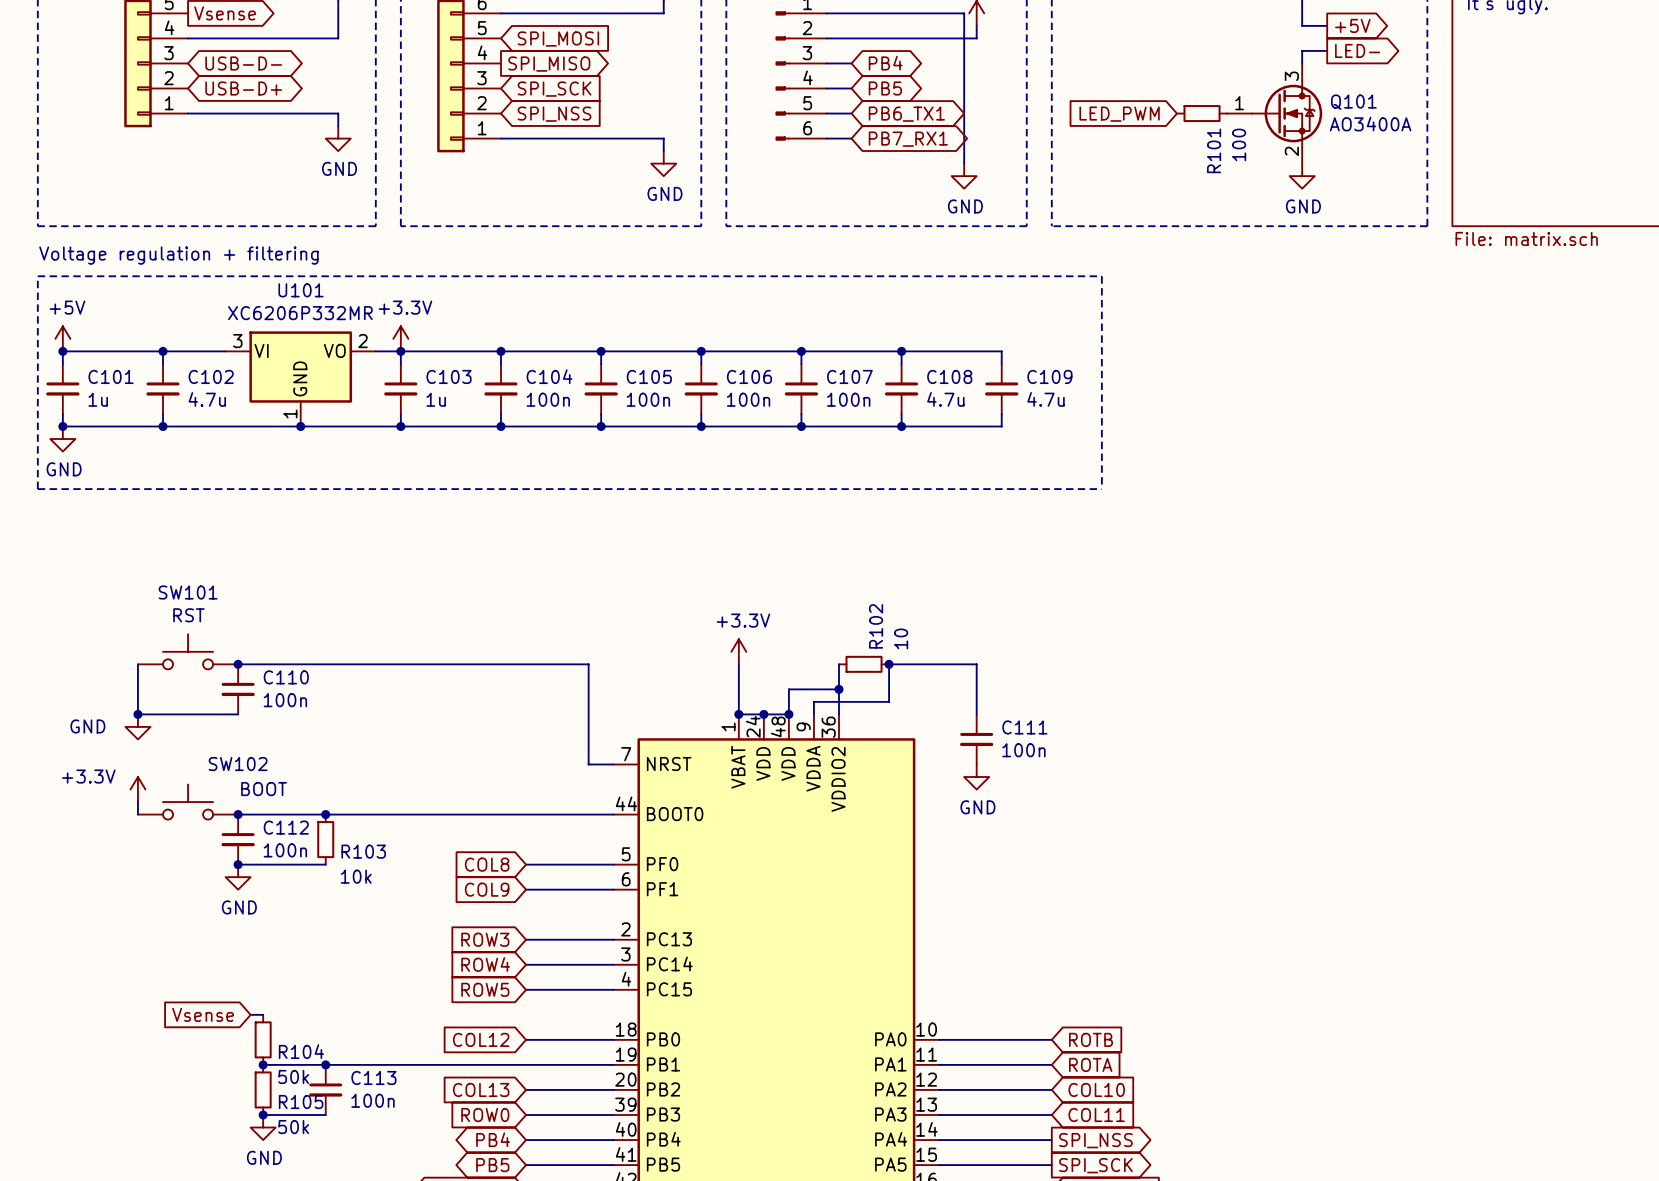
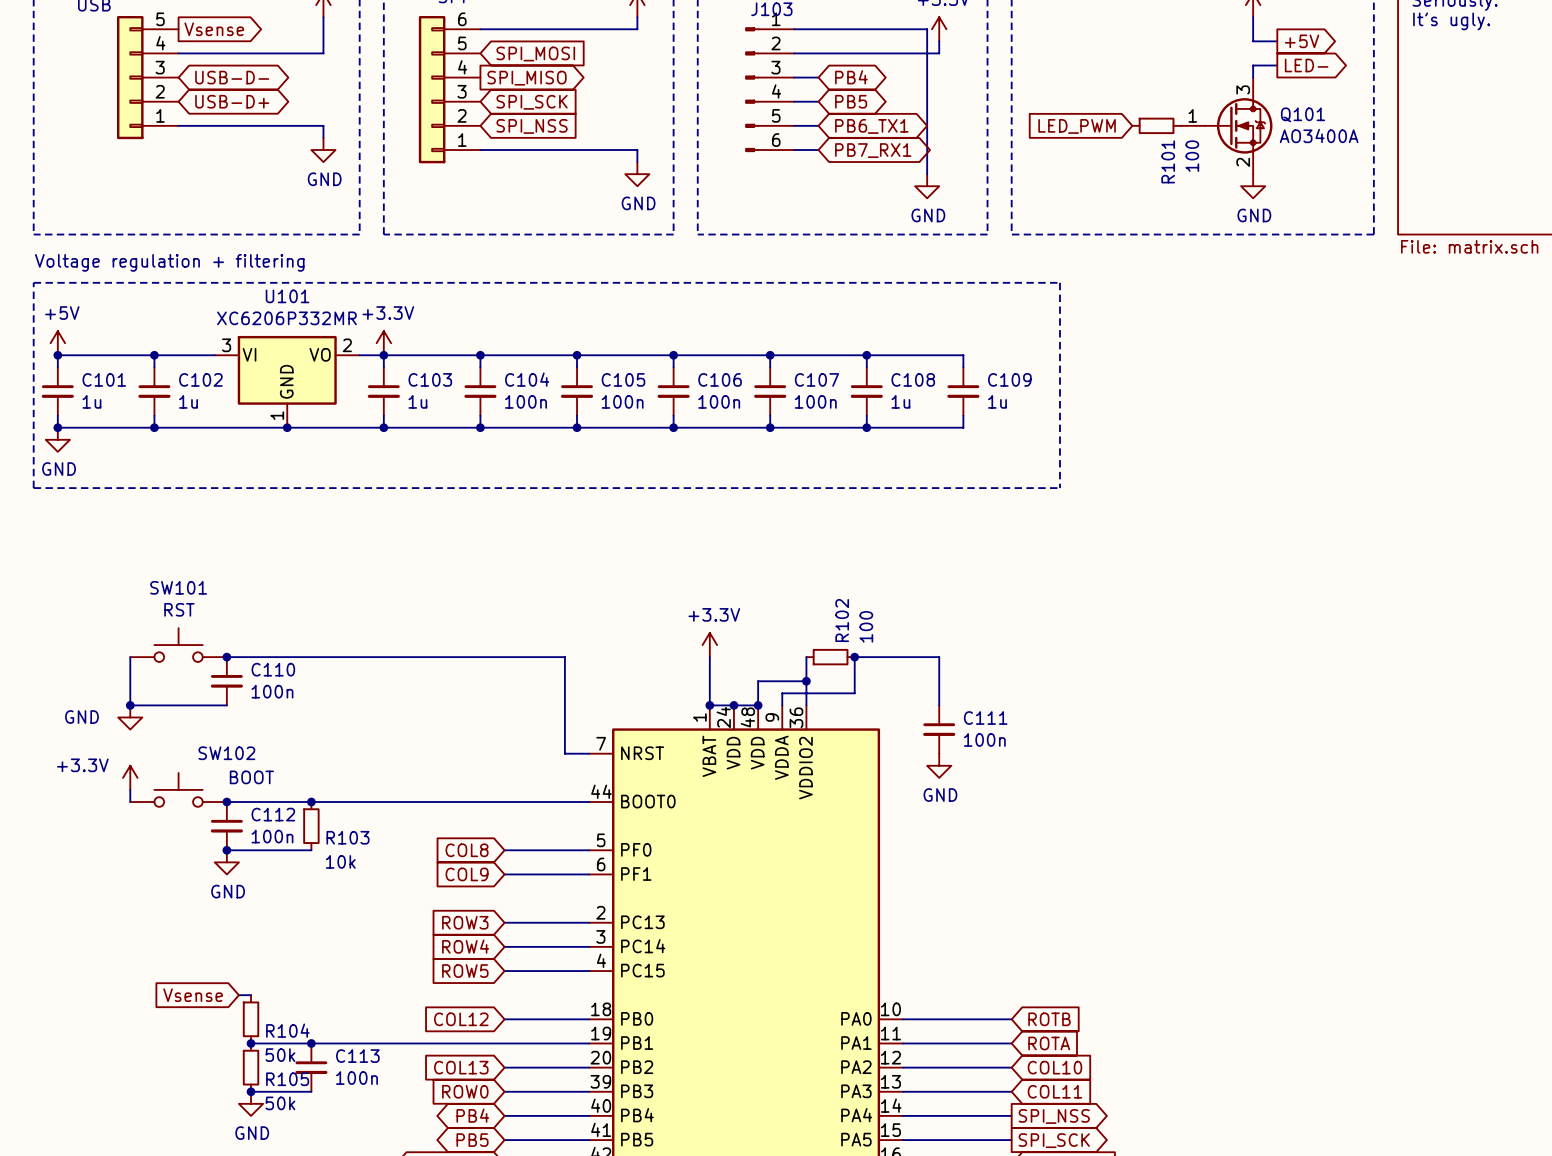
C102 value: 4.7u (207, 399) -> 1u (188, 401)
C108 value: 4.7u (945, 399) -> 1u (900, 401)
C109 value: 4.7u (1046, 399) -> 1u (997, 401)
R102 value: 10 (901, 638) -> 100 (866, 626)

